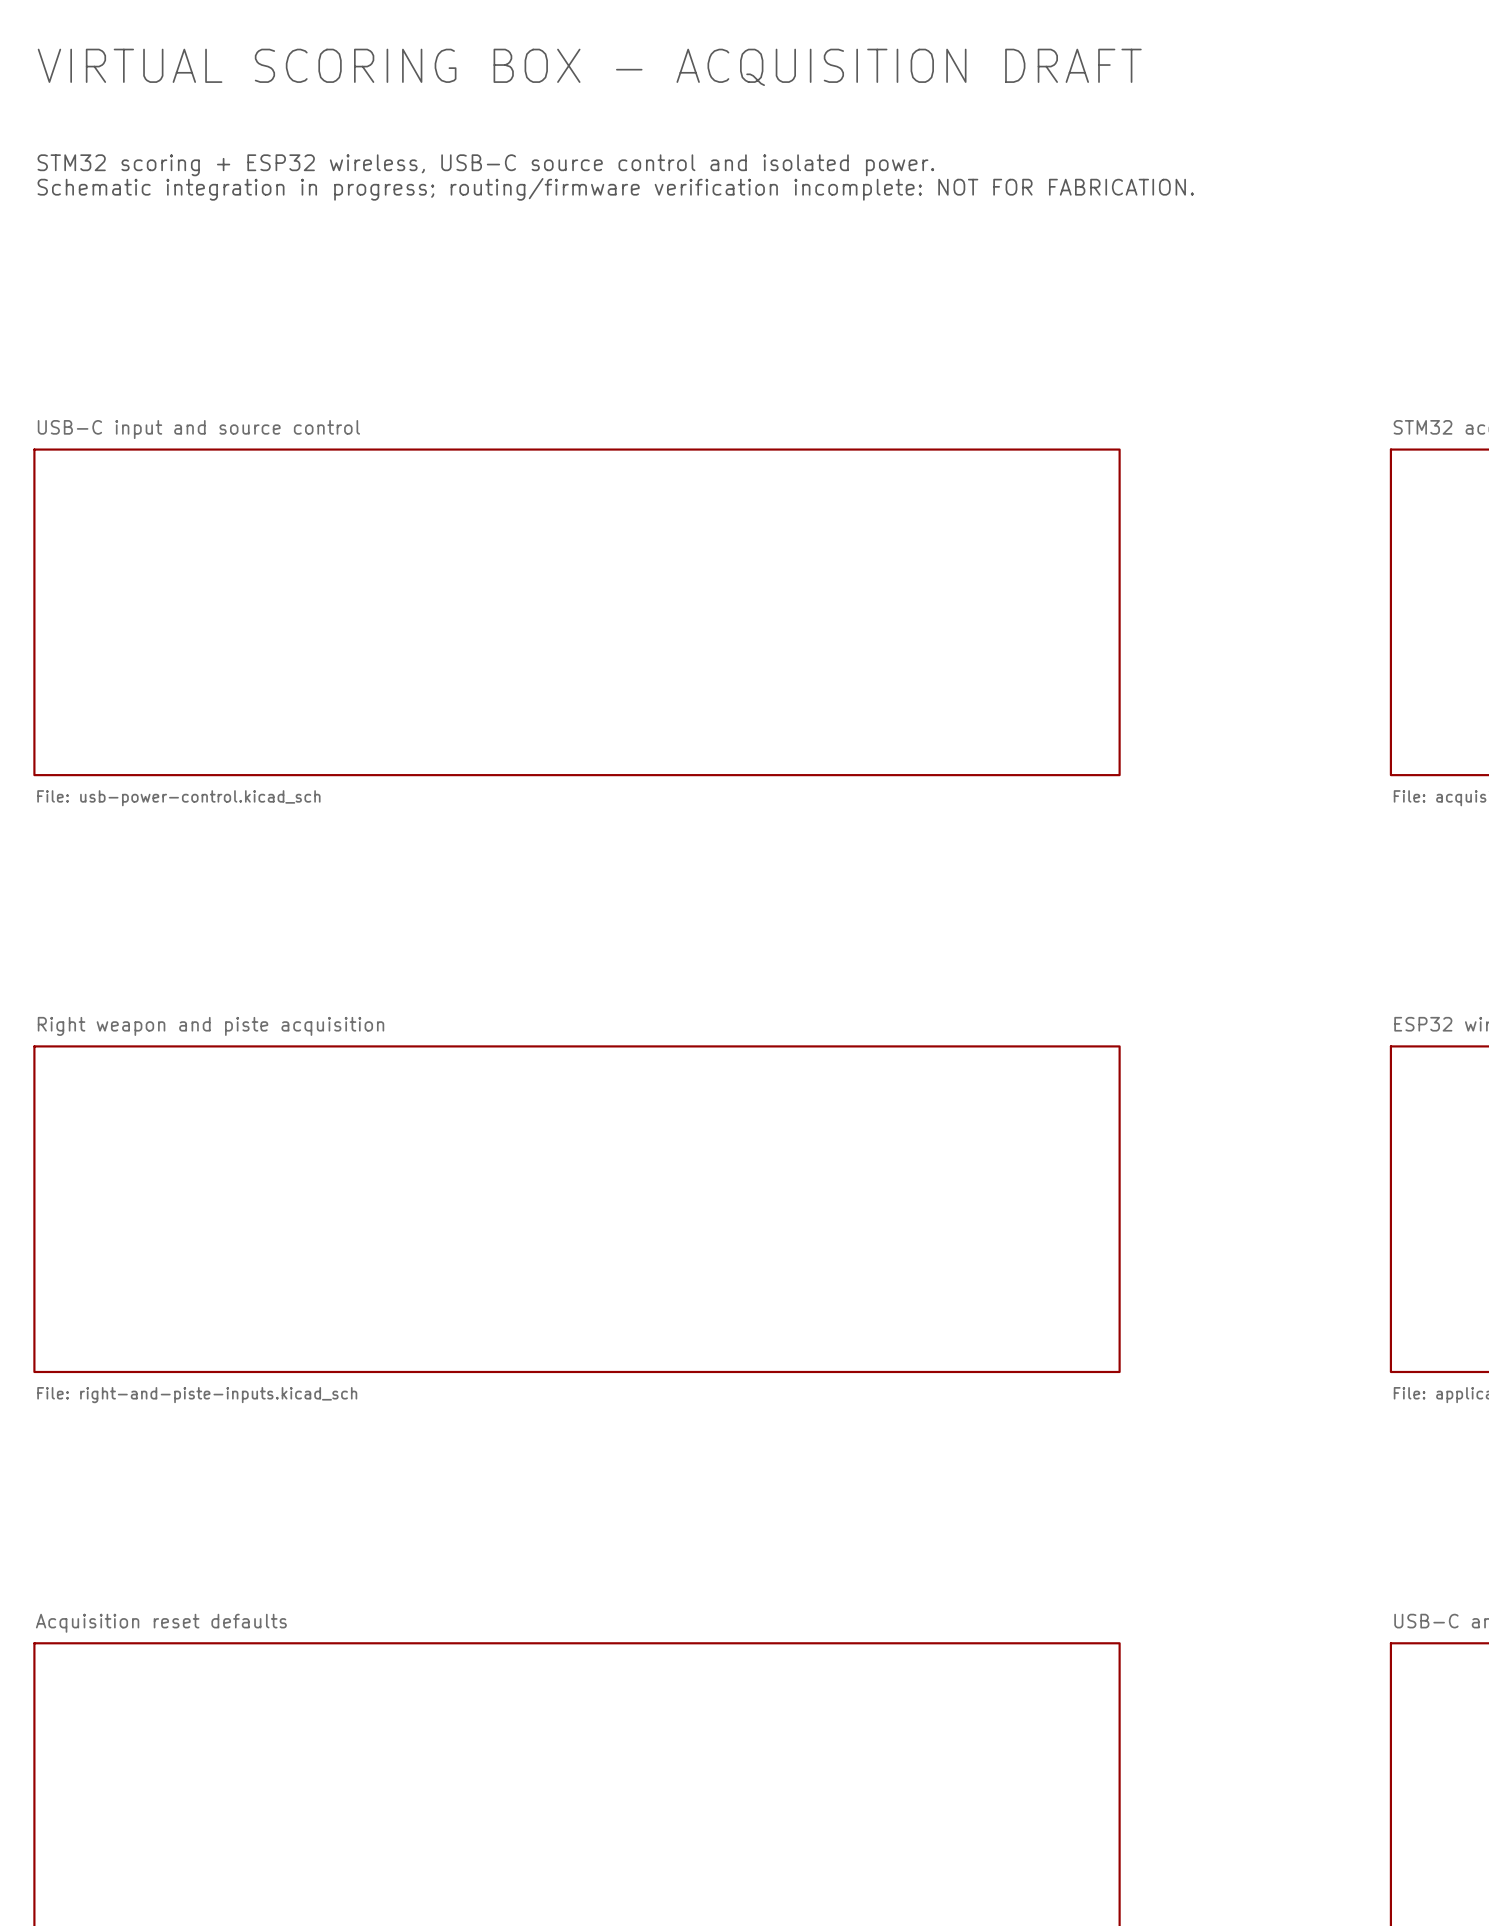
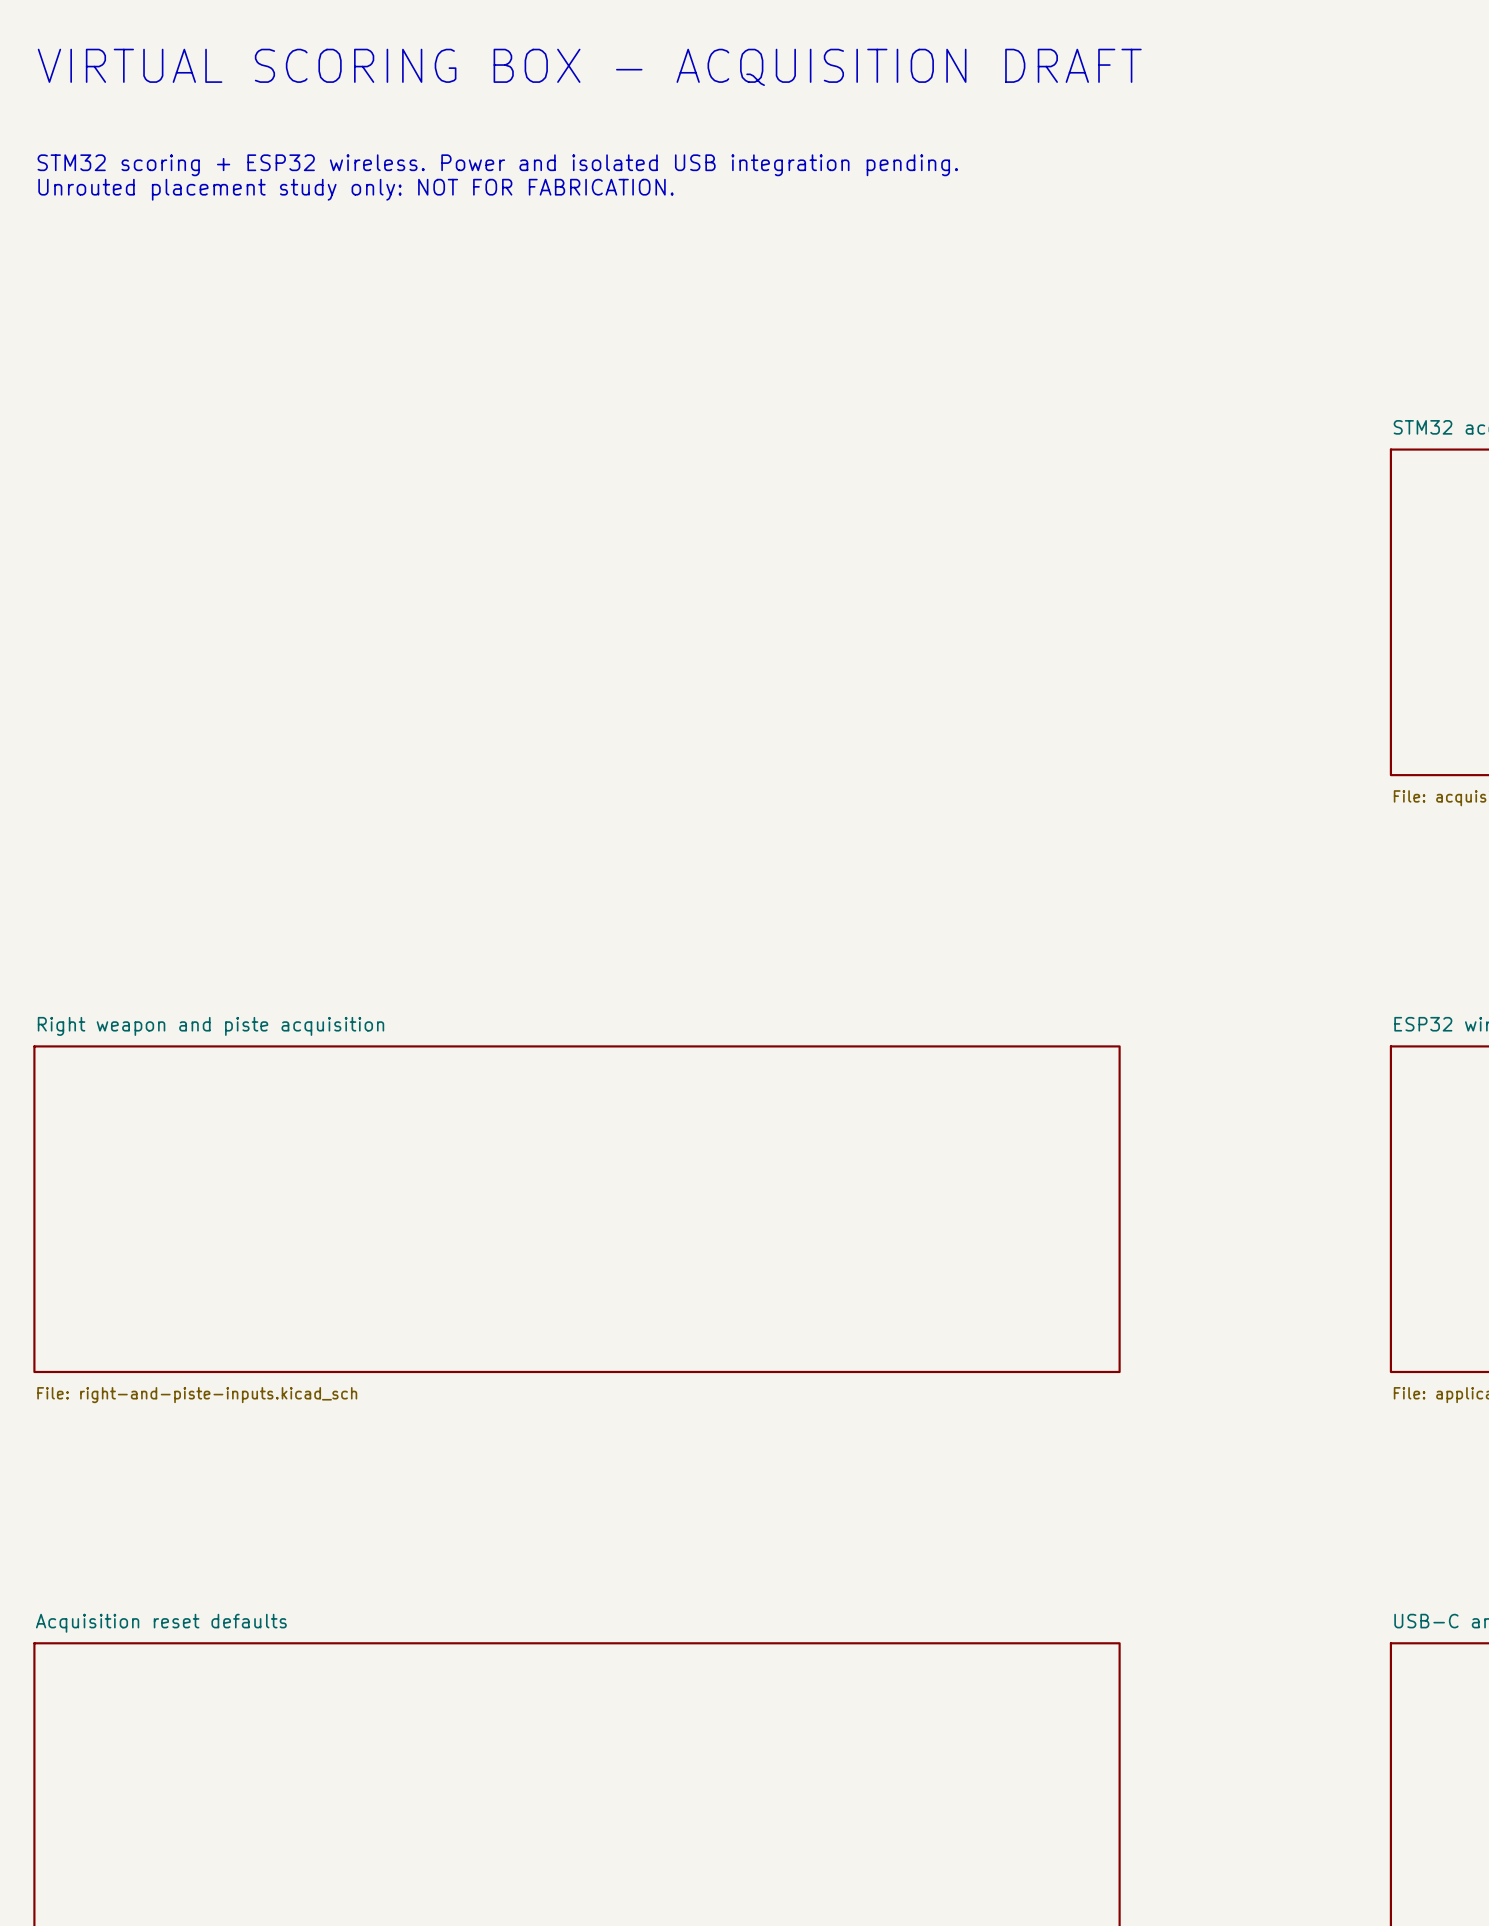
text: STM32 scoring + ESP32 wireless, USB-C source control and isolated power. (485, 165) -> STM32 scoring + ESP32 wireless. Power and isolated USB integration pending. (497, 165)
text: Schematic integration in progress; routing/firmware verification incomplete: NOT FOR FABRICATION. (615, 189) -> Unrouted placement study only: NOT FOR FABRICATION. (355, 189)
sheet USB-C input and source control: File: usb-power-control.kicad_sch (577, 612) -> none

